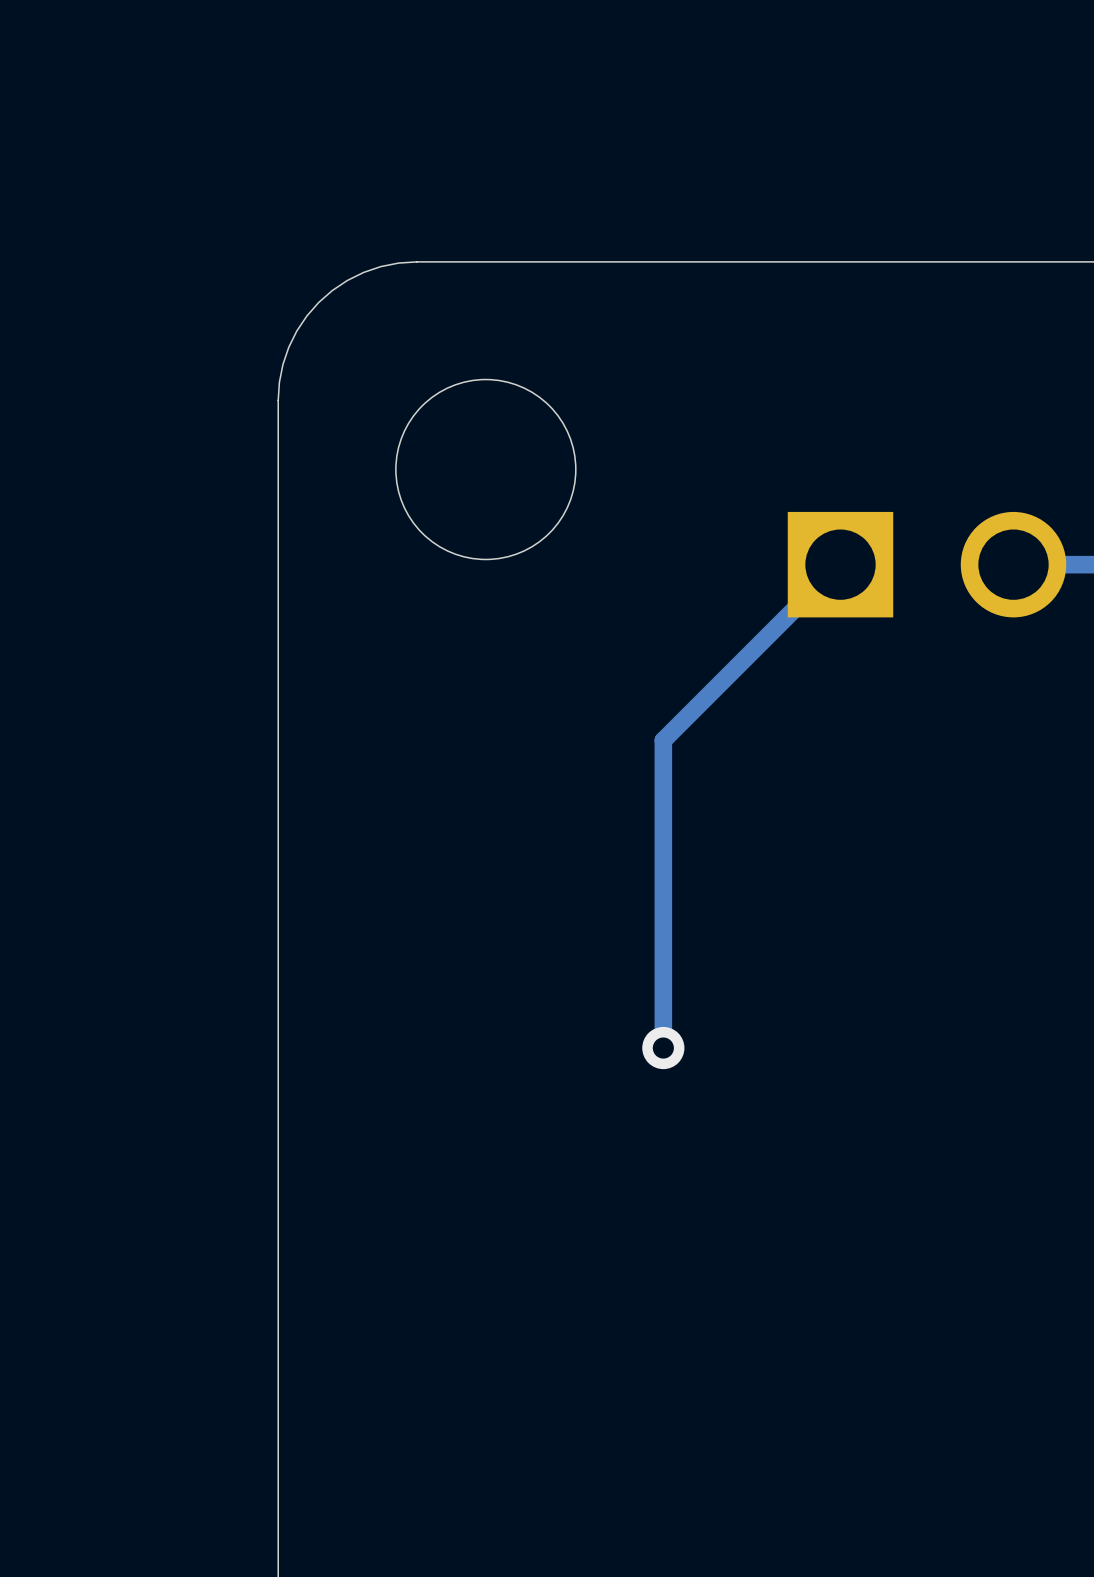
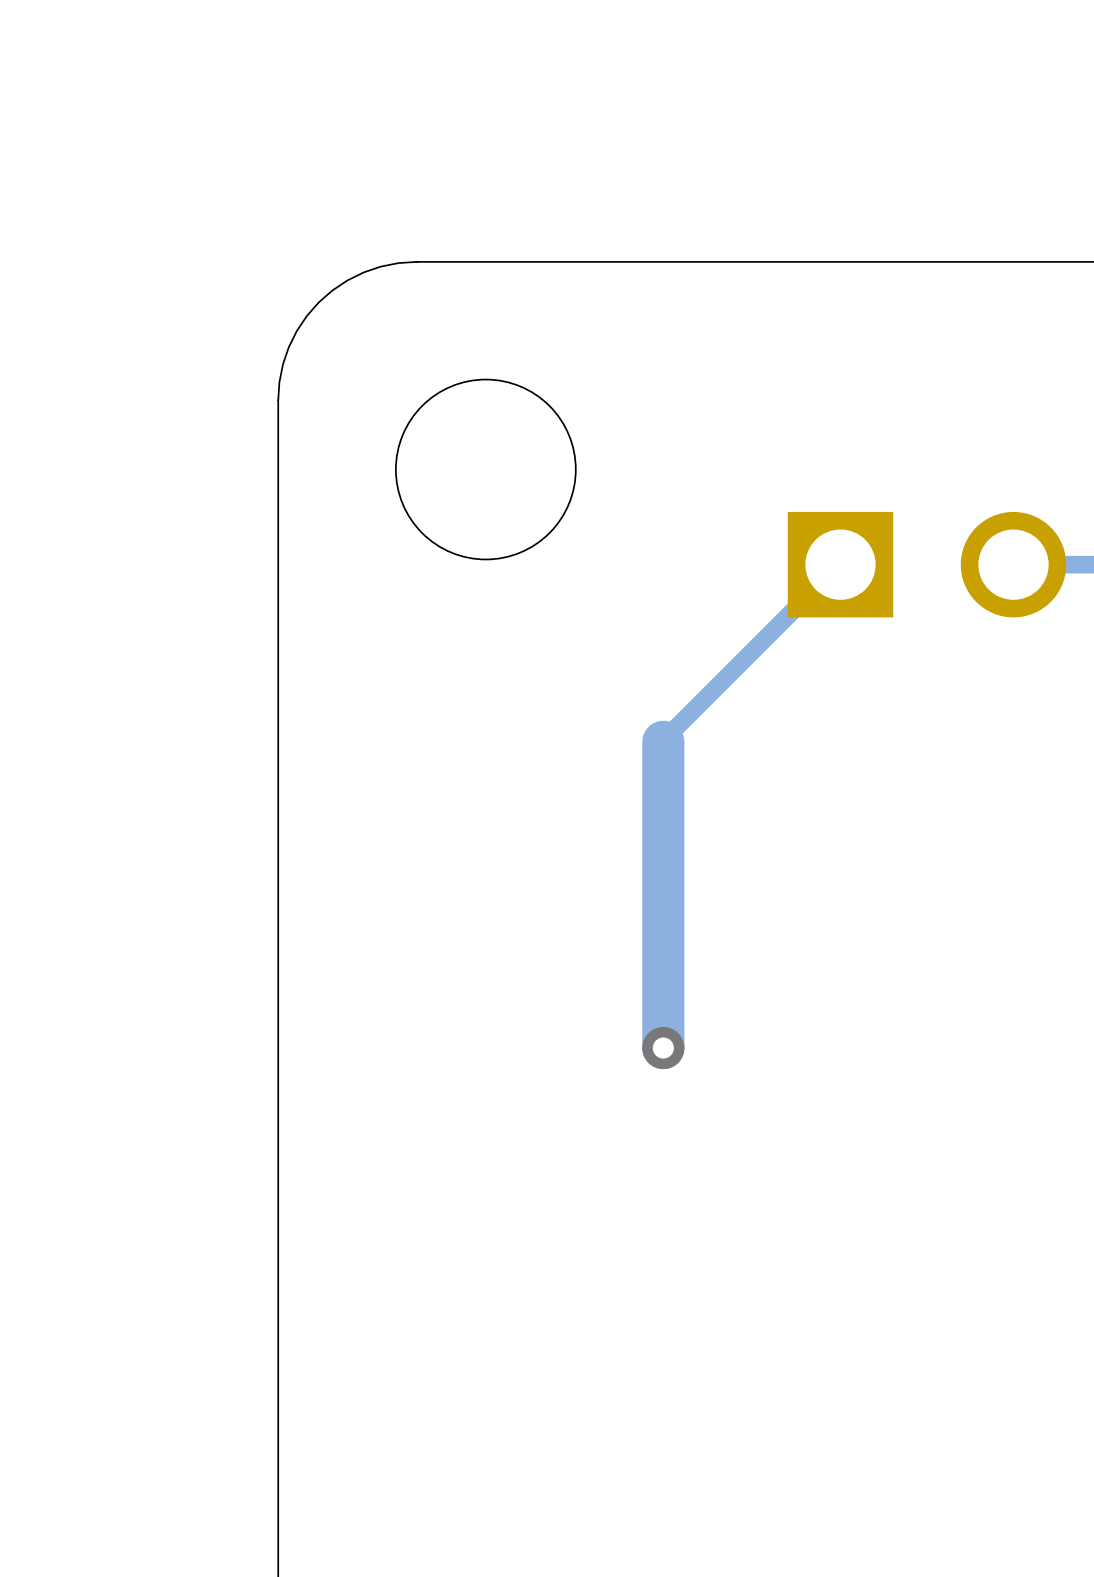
track width: thin (663, 741) (663, 1048) -> thick (663, 741) (663, 1048)

